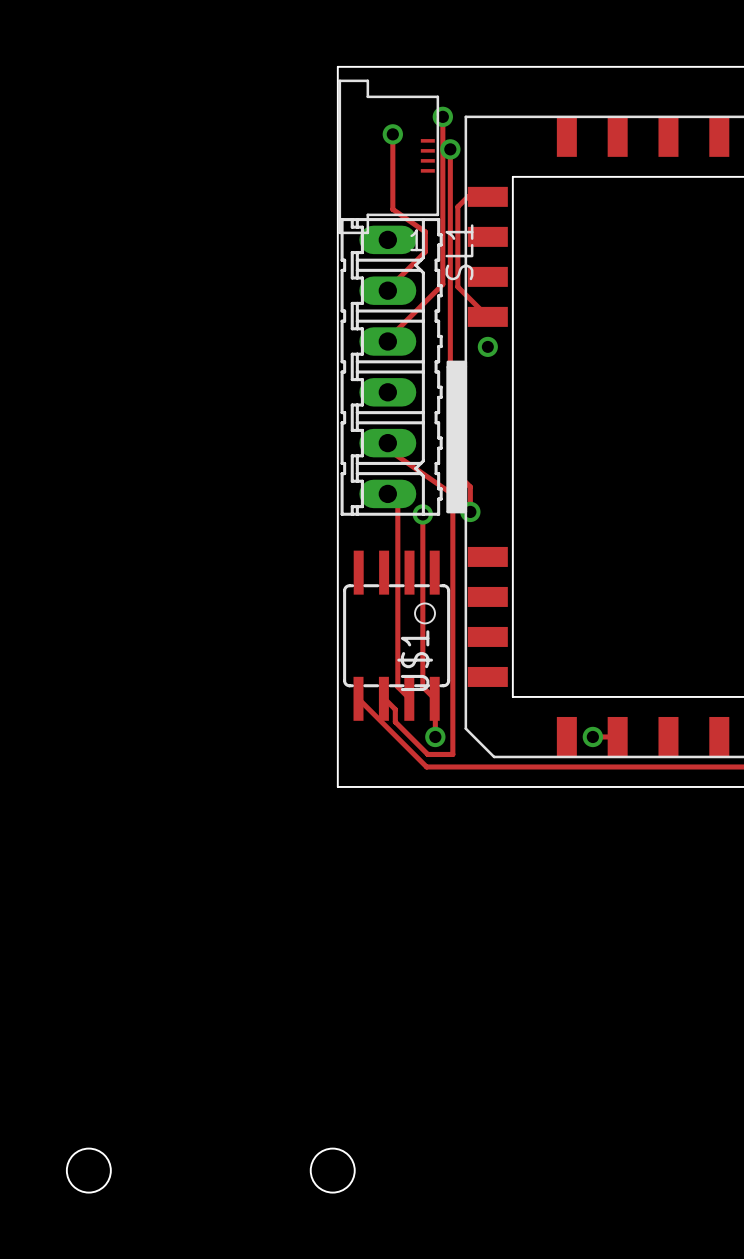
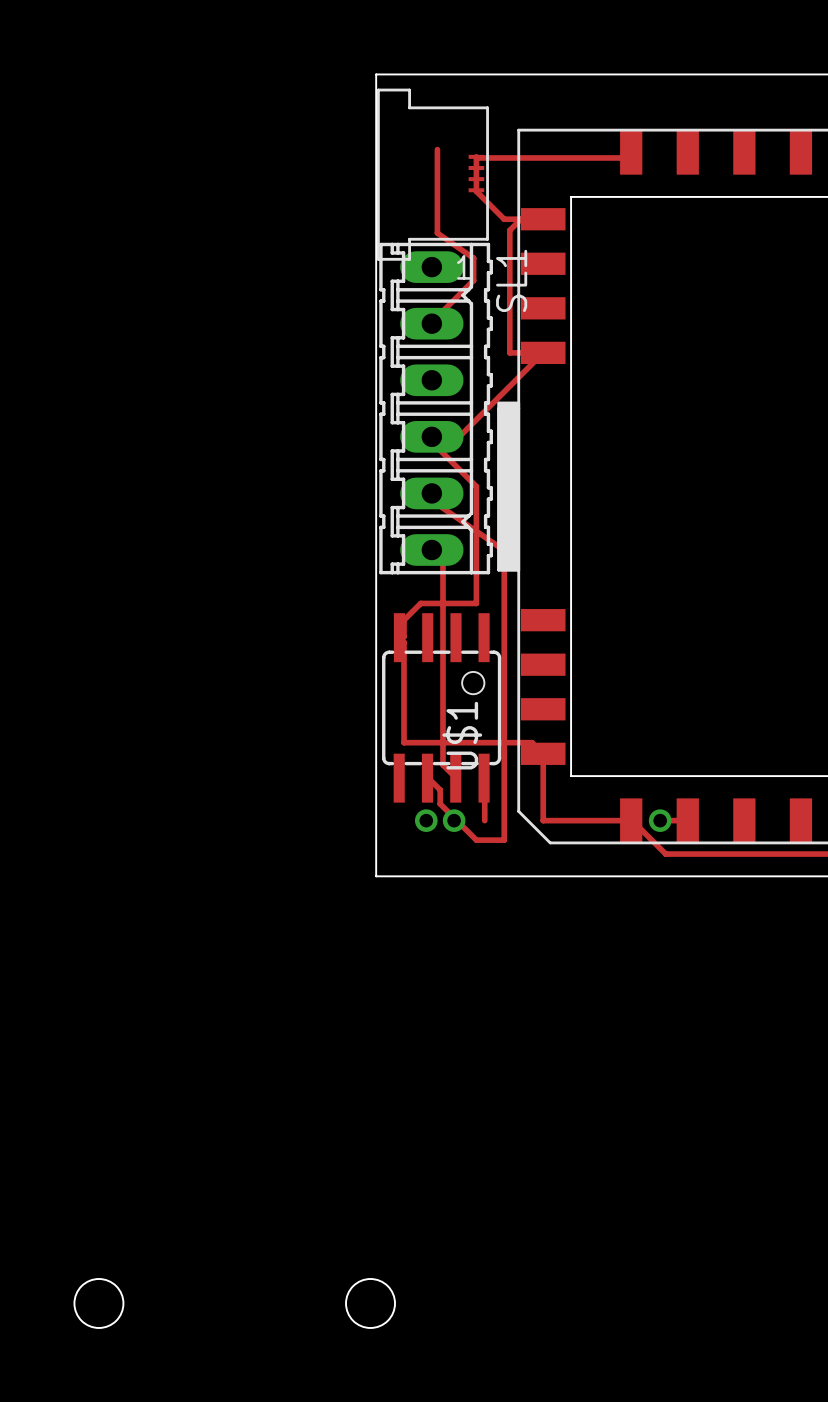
track: (442, 116) (442, 284) (387, 341) -> none
via: (442, 116) -> none
via: (392, 134) -> none
track: none -> (631, 152) (626, 152) (621, 157) (476, 157)
track: none -> (476, 156) (476, 191) (504, 219) (520, 219)
track: (450, 149) (450, 466) (470, 486) (470, 511) -> none
via: (450, 149) -> none
track: (457, 286) (487, 316) -> none
via: (487, 346) -> none
via: (470, 511) -> none
track: (422, 514) (422, 686) (432, 696) -> none
via: (422, 514) -> none
track: (358, 698) (426, 766) (597, 766) -> (509, 319) (509, 352) (543, 352) (459, 436) (431, 436) (431, 441) (476, 486) (476, 603) (420, 603) (404, 620) (404, 636) (399, 637) (404, 642) (404, 742) (532, 742) (543, 753) (543, 820) (632, 820) (665, 854)
via: none -> (426, 820)
via: none -> (454, 820)
via: (435, 736) -> none

